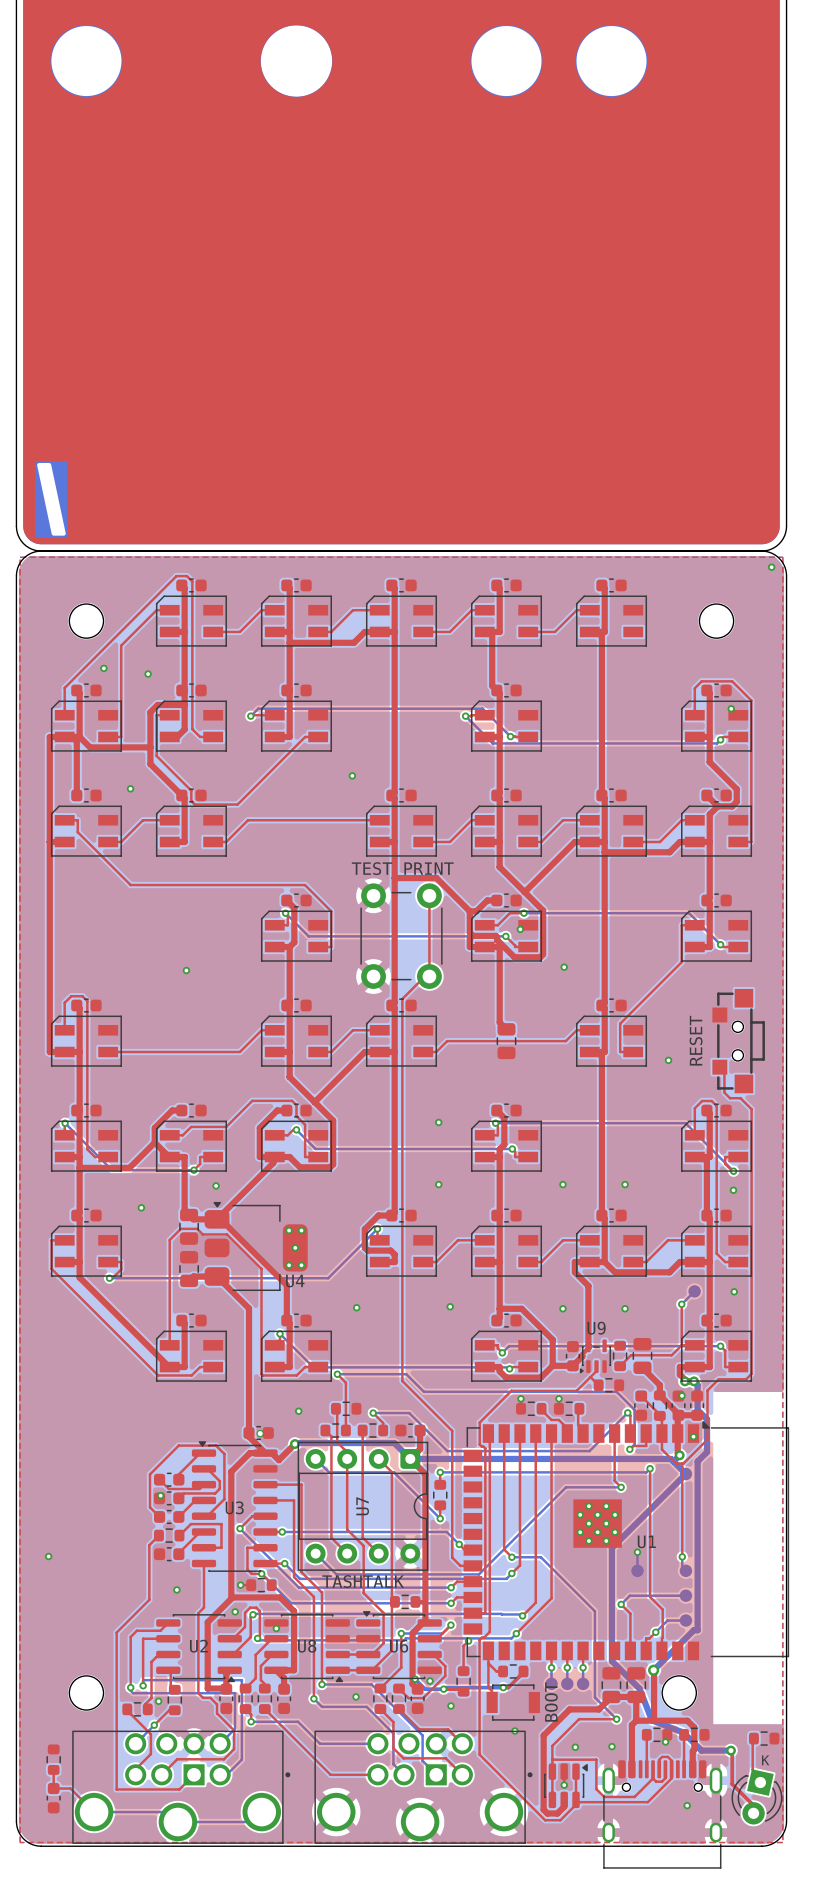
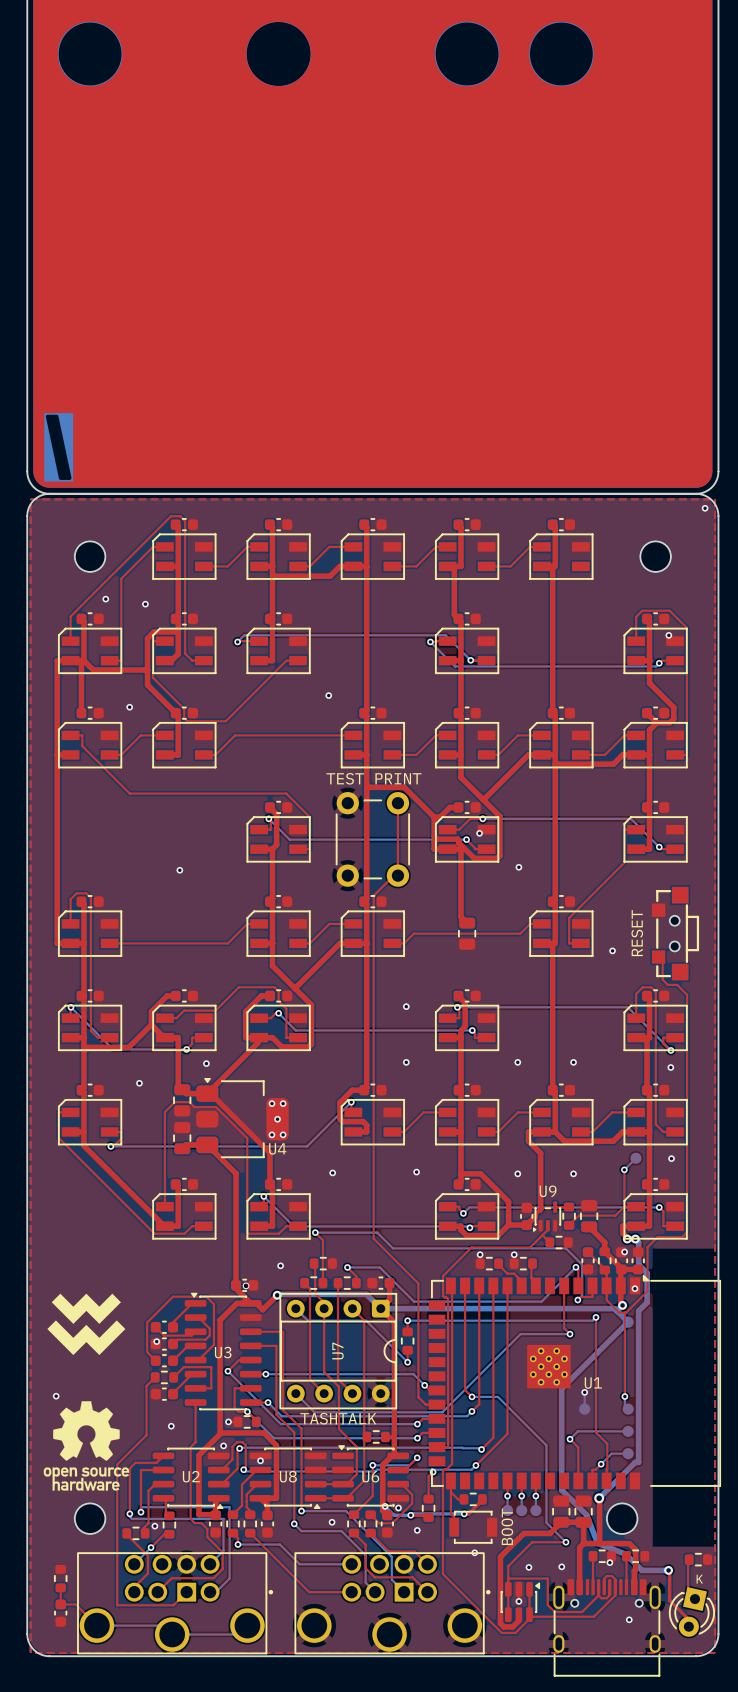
drawing: none -> [47, 1293, 126, 1356]
drawing: none -> [43, 1401, 130, 1491]

